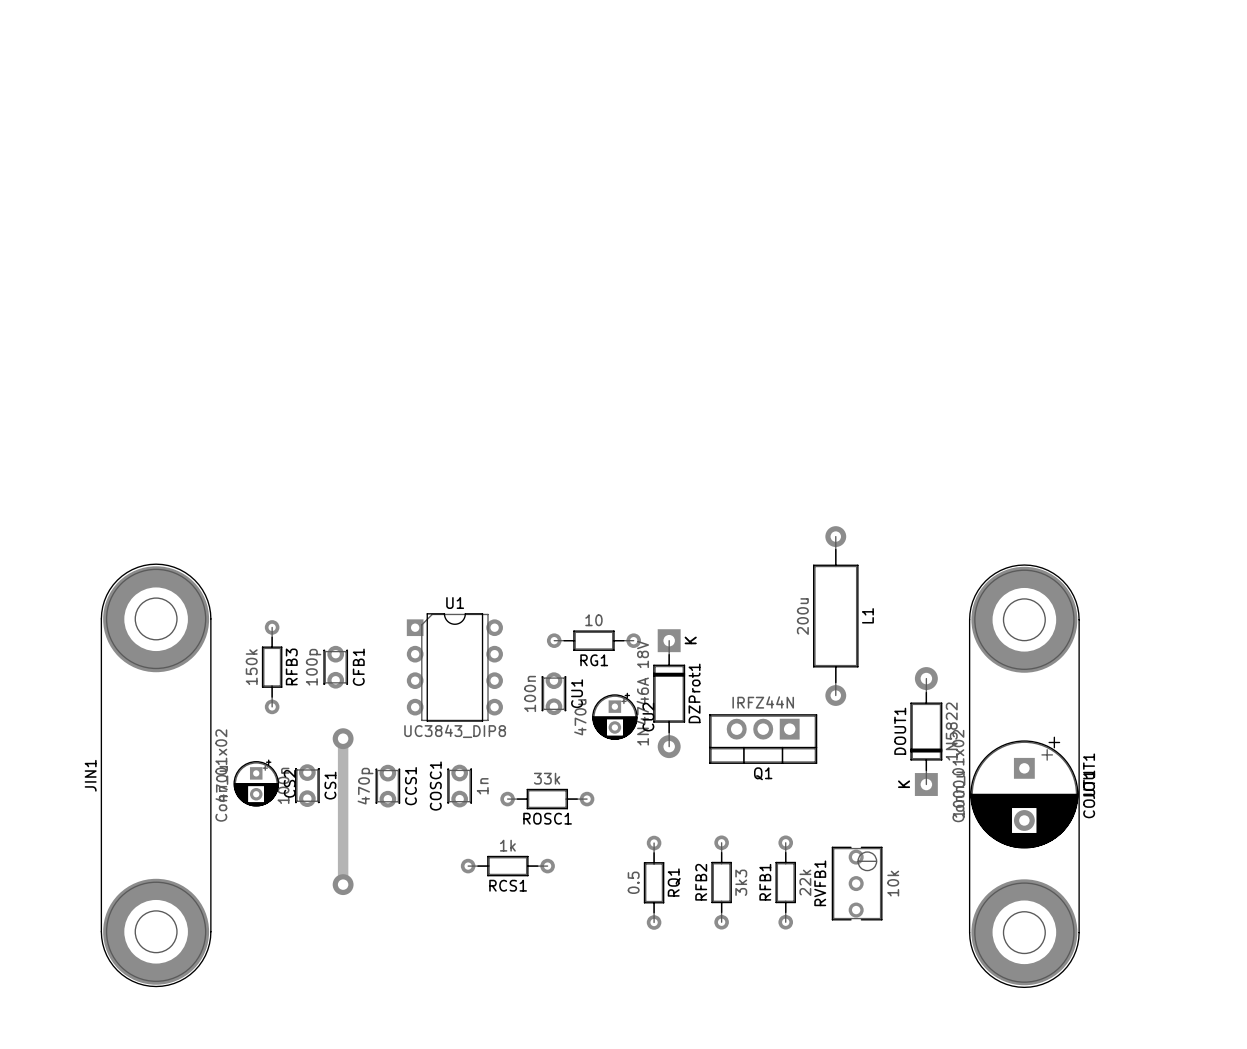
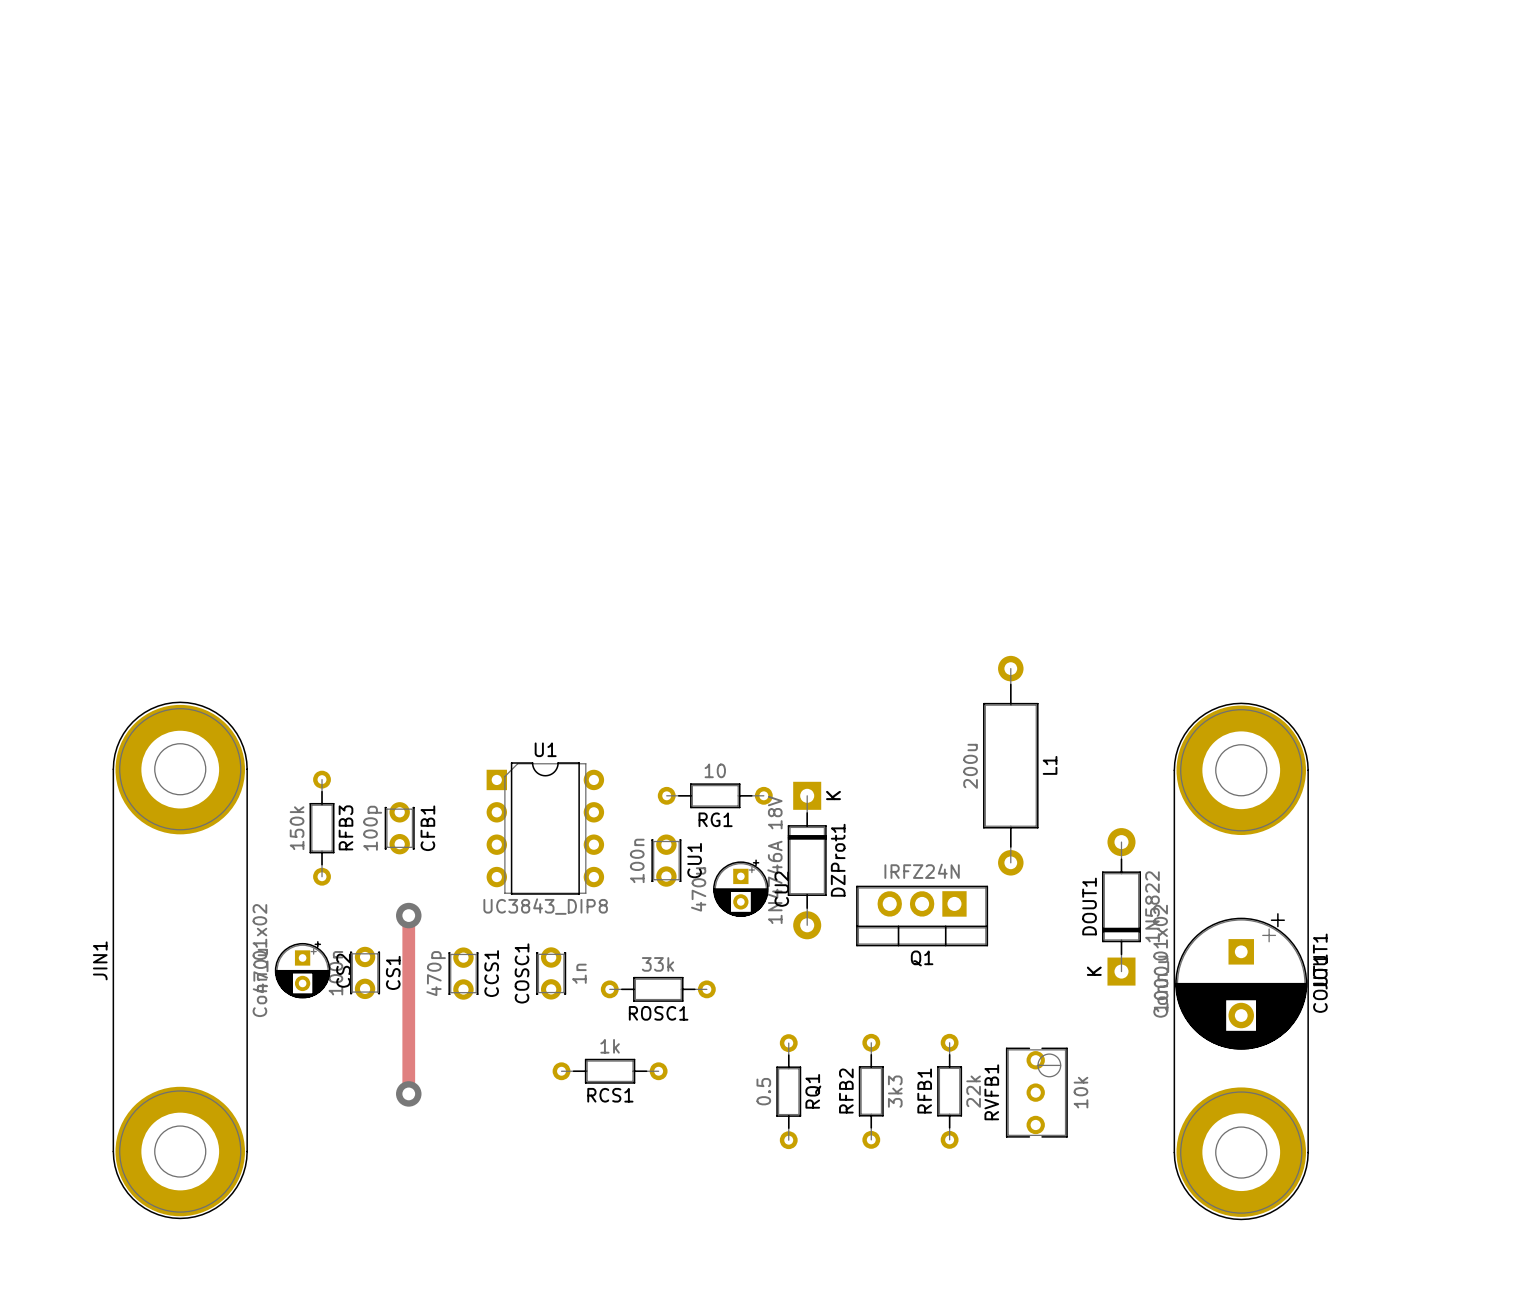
Q1 value: IRFZ44N (763, 702) -> IRFZ24N (922, 871)

